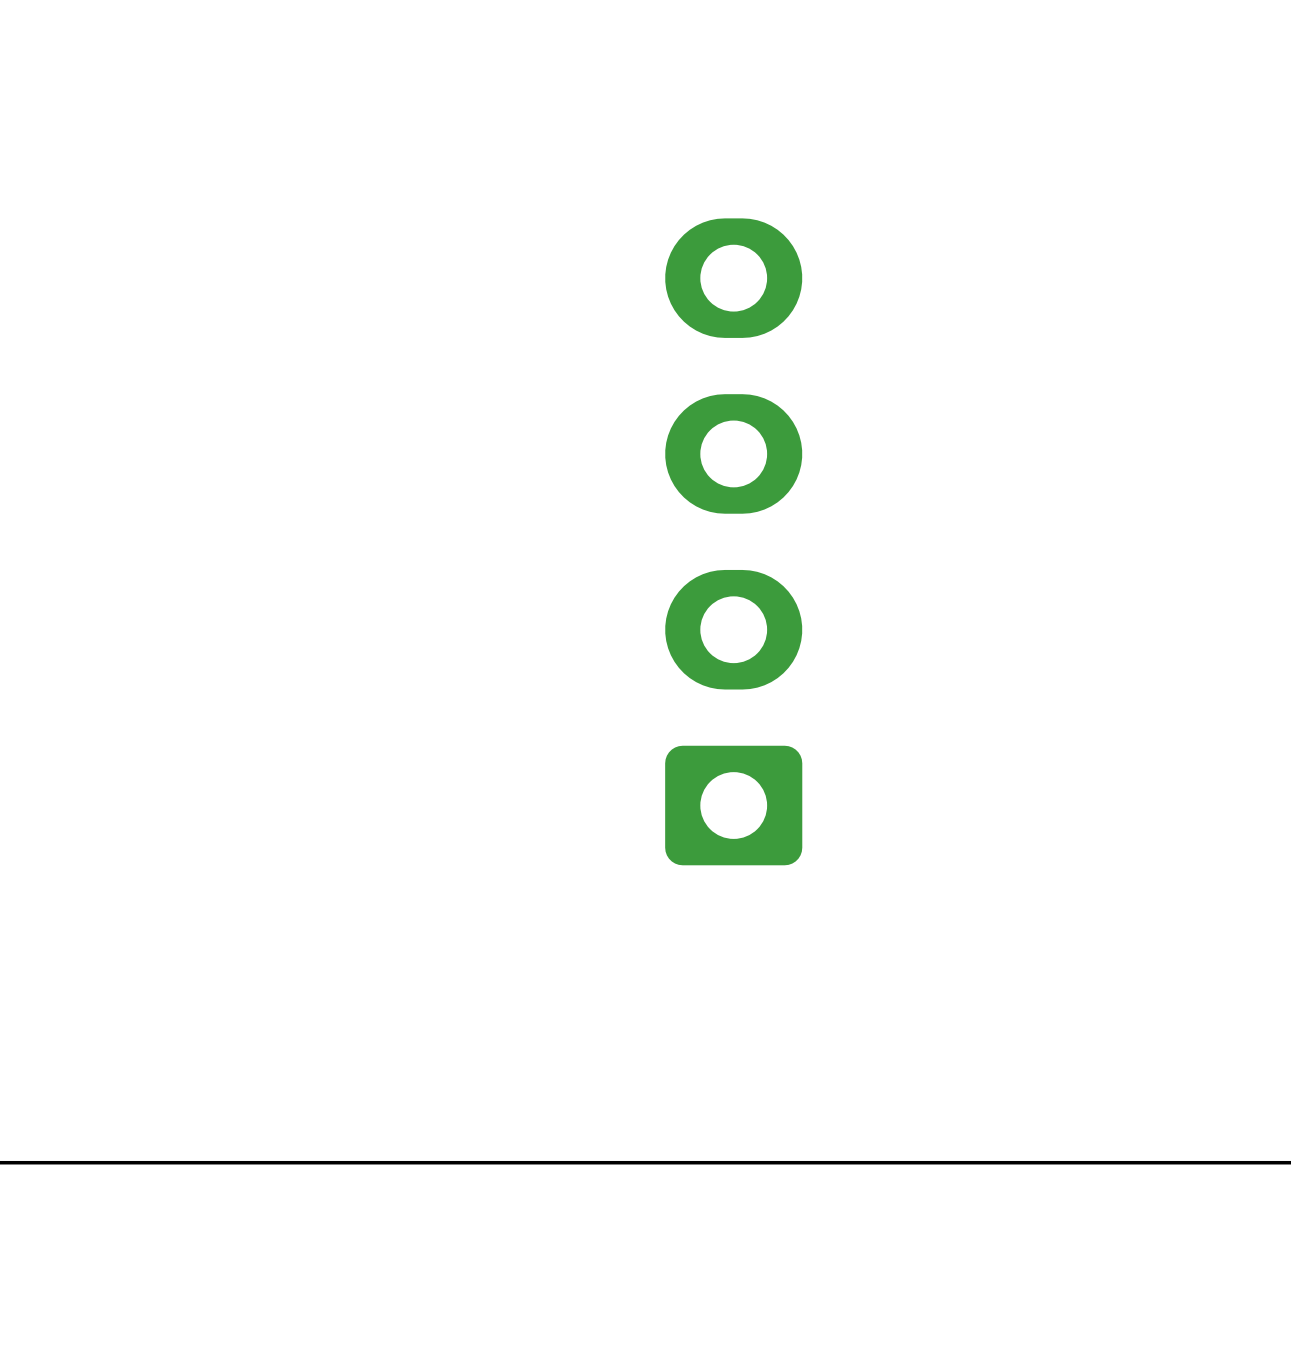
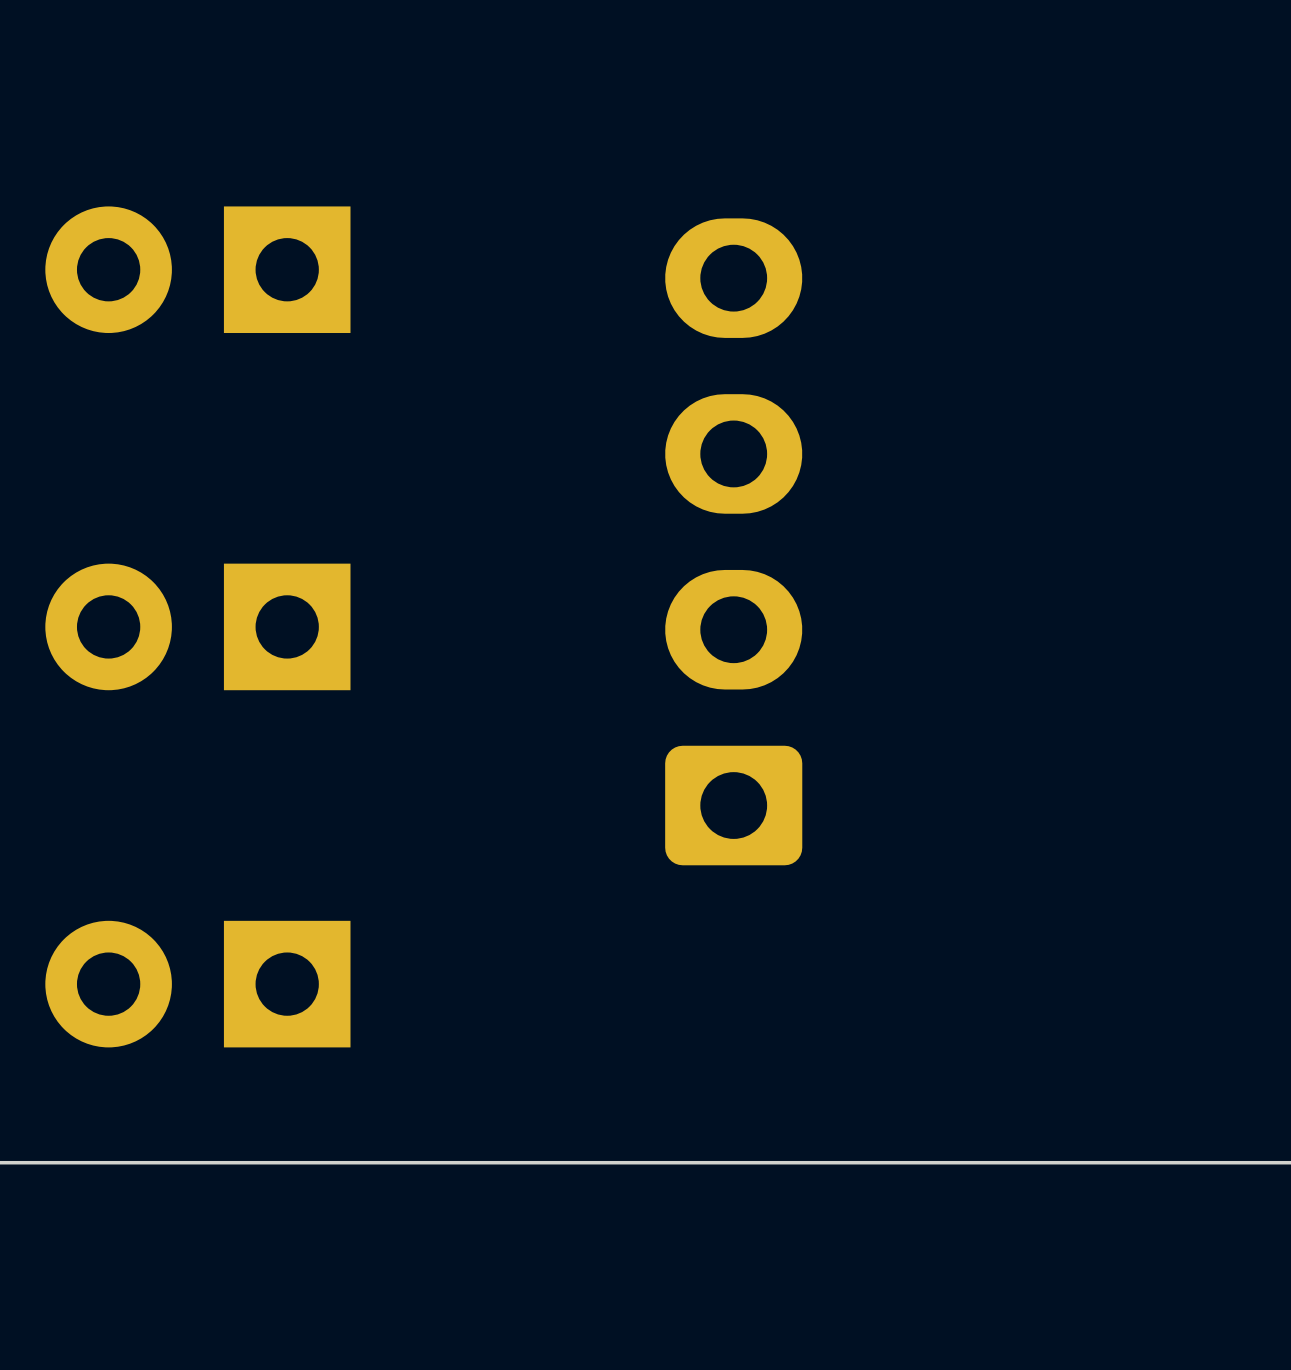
part: none -> (197, 269)
part: none -> (197, 626)
part: none -> (197, 984)

